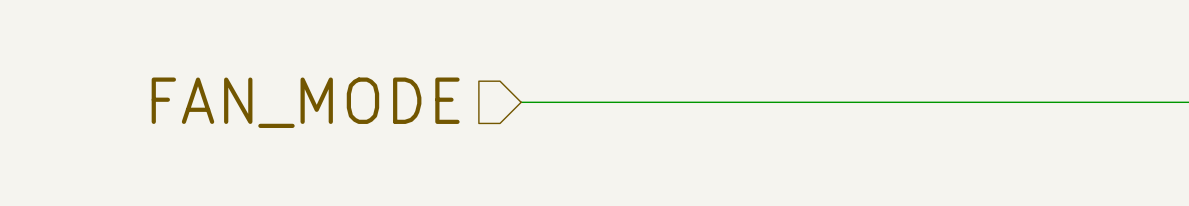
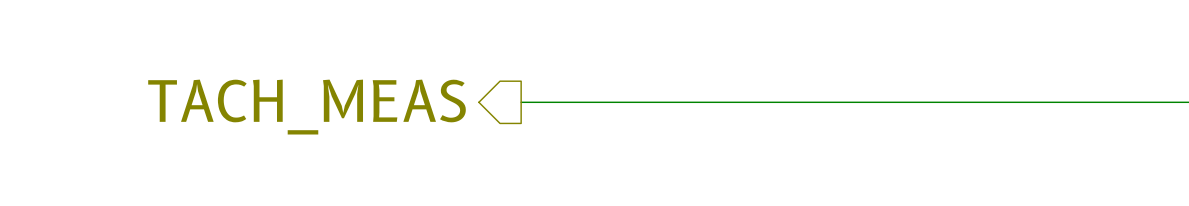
hierarchical label shape: input (305, 102) -> output (307, 107)
hierarchical label: FAN_MODE (305, 102) -> TACH_MEAS (307, 107)

